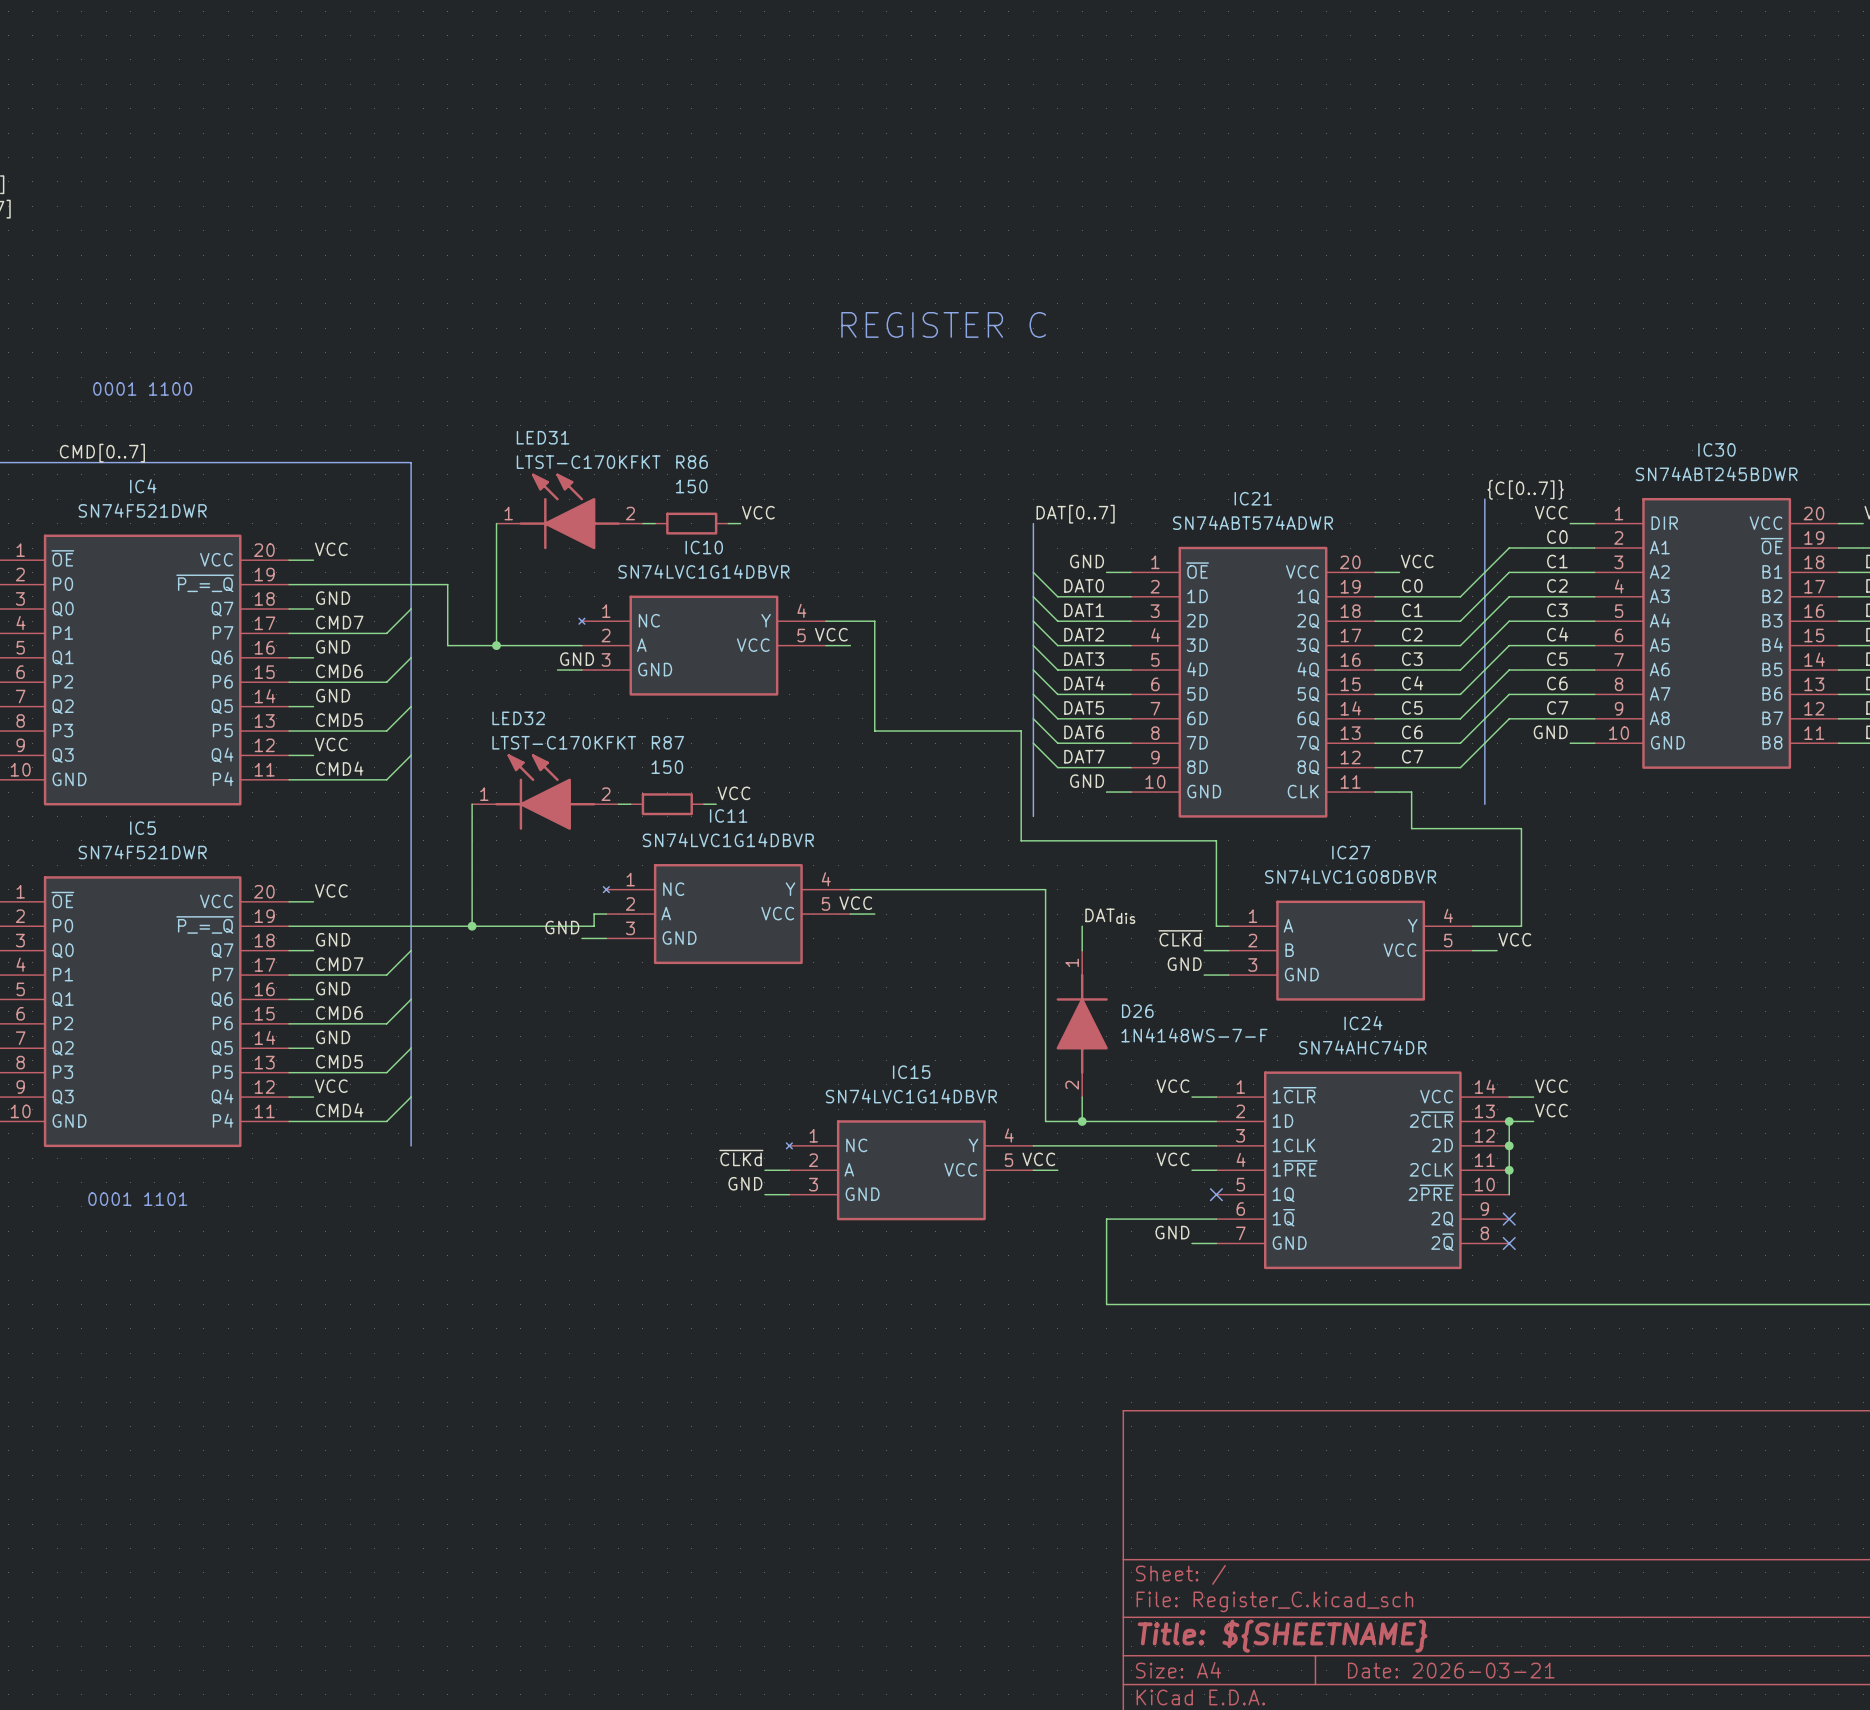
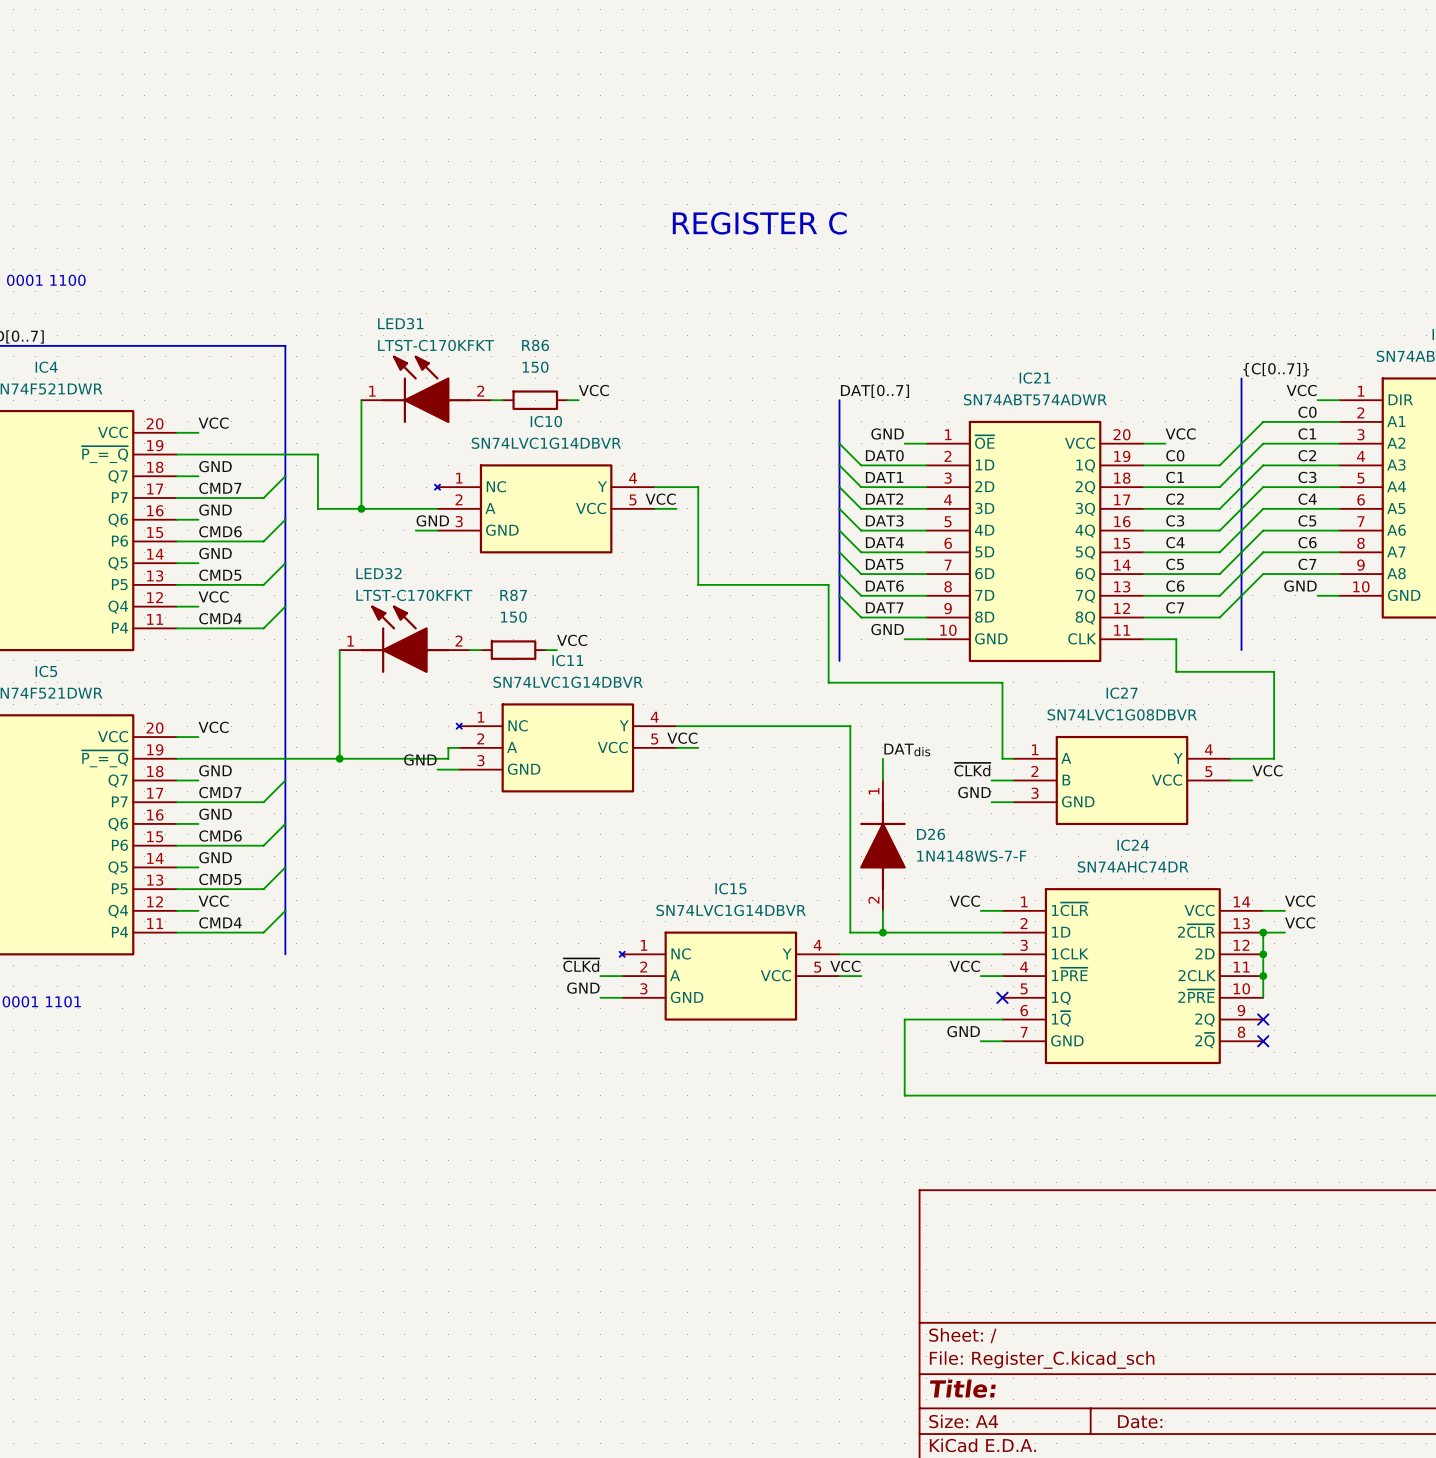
title block: Title: ${SHEETNAME} (1282, 1636) -> Title: (962, 1388)
title block: Date: 2026-03-21 (1451, 1670) -> Date: (1140, 1421)

